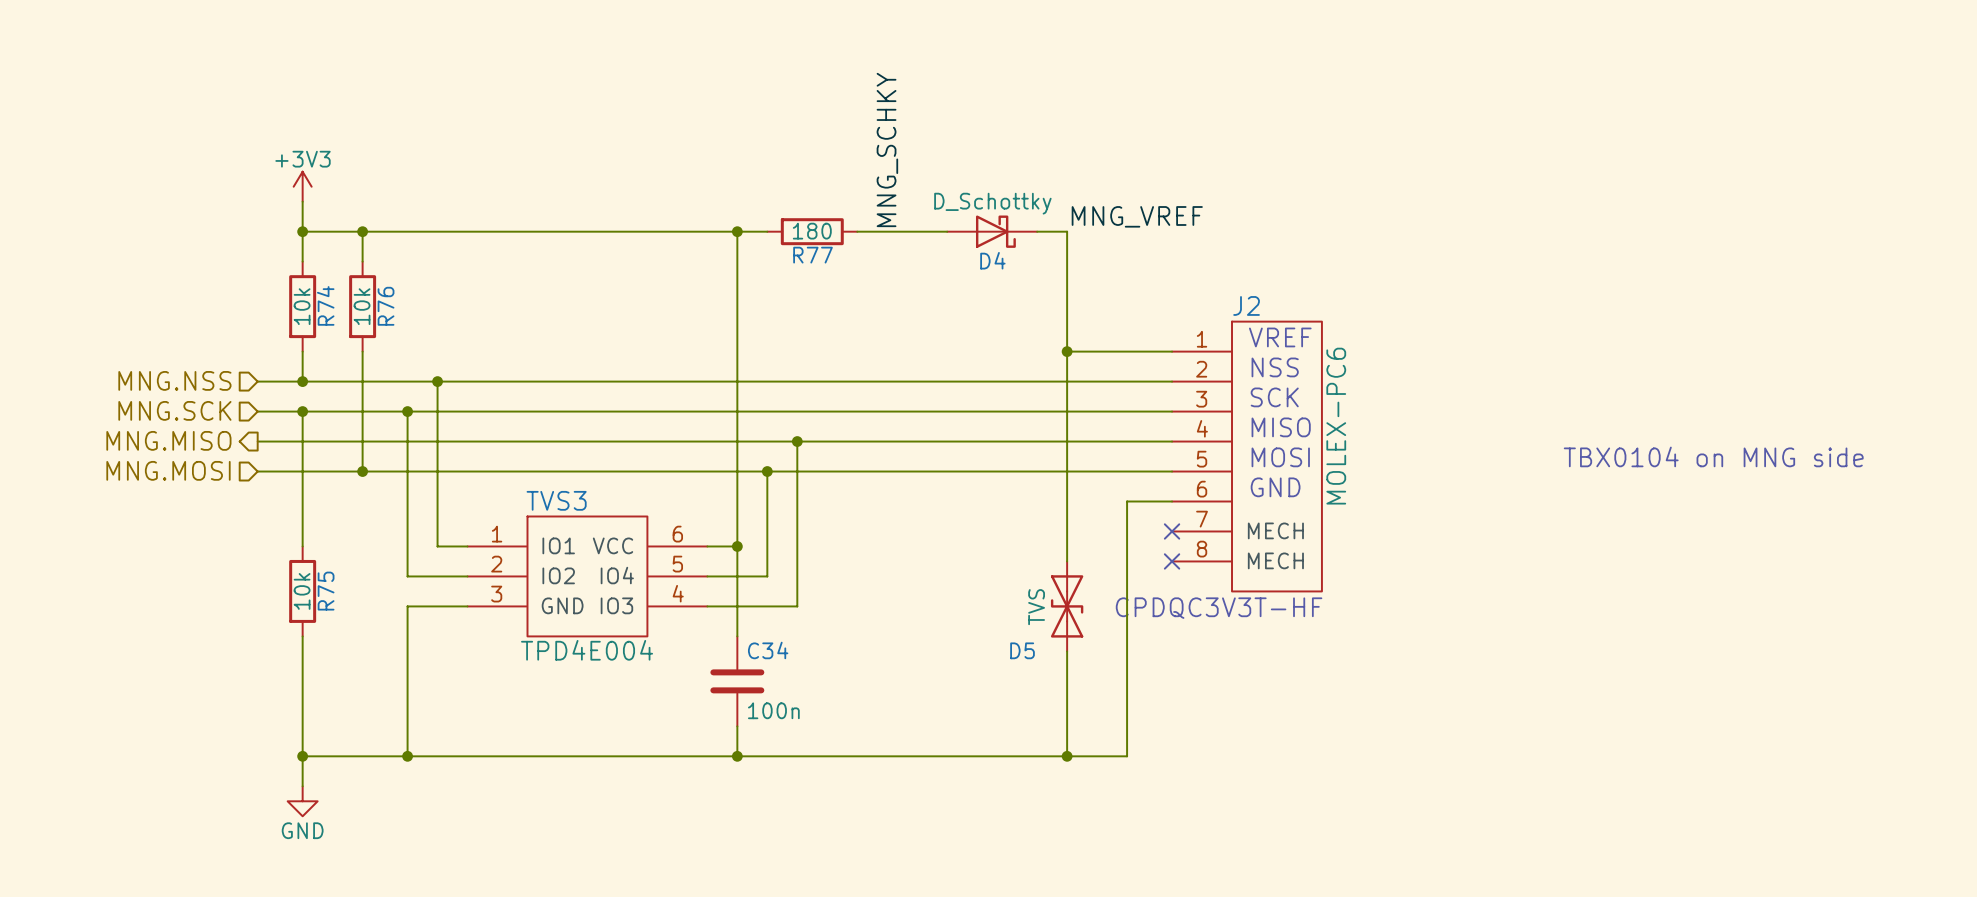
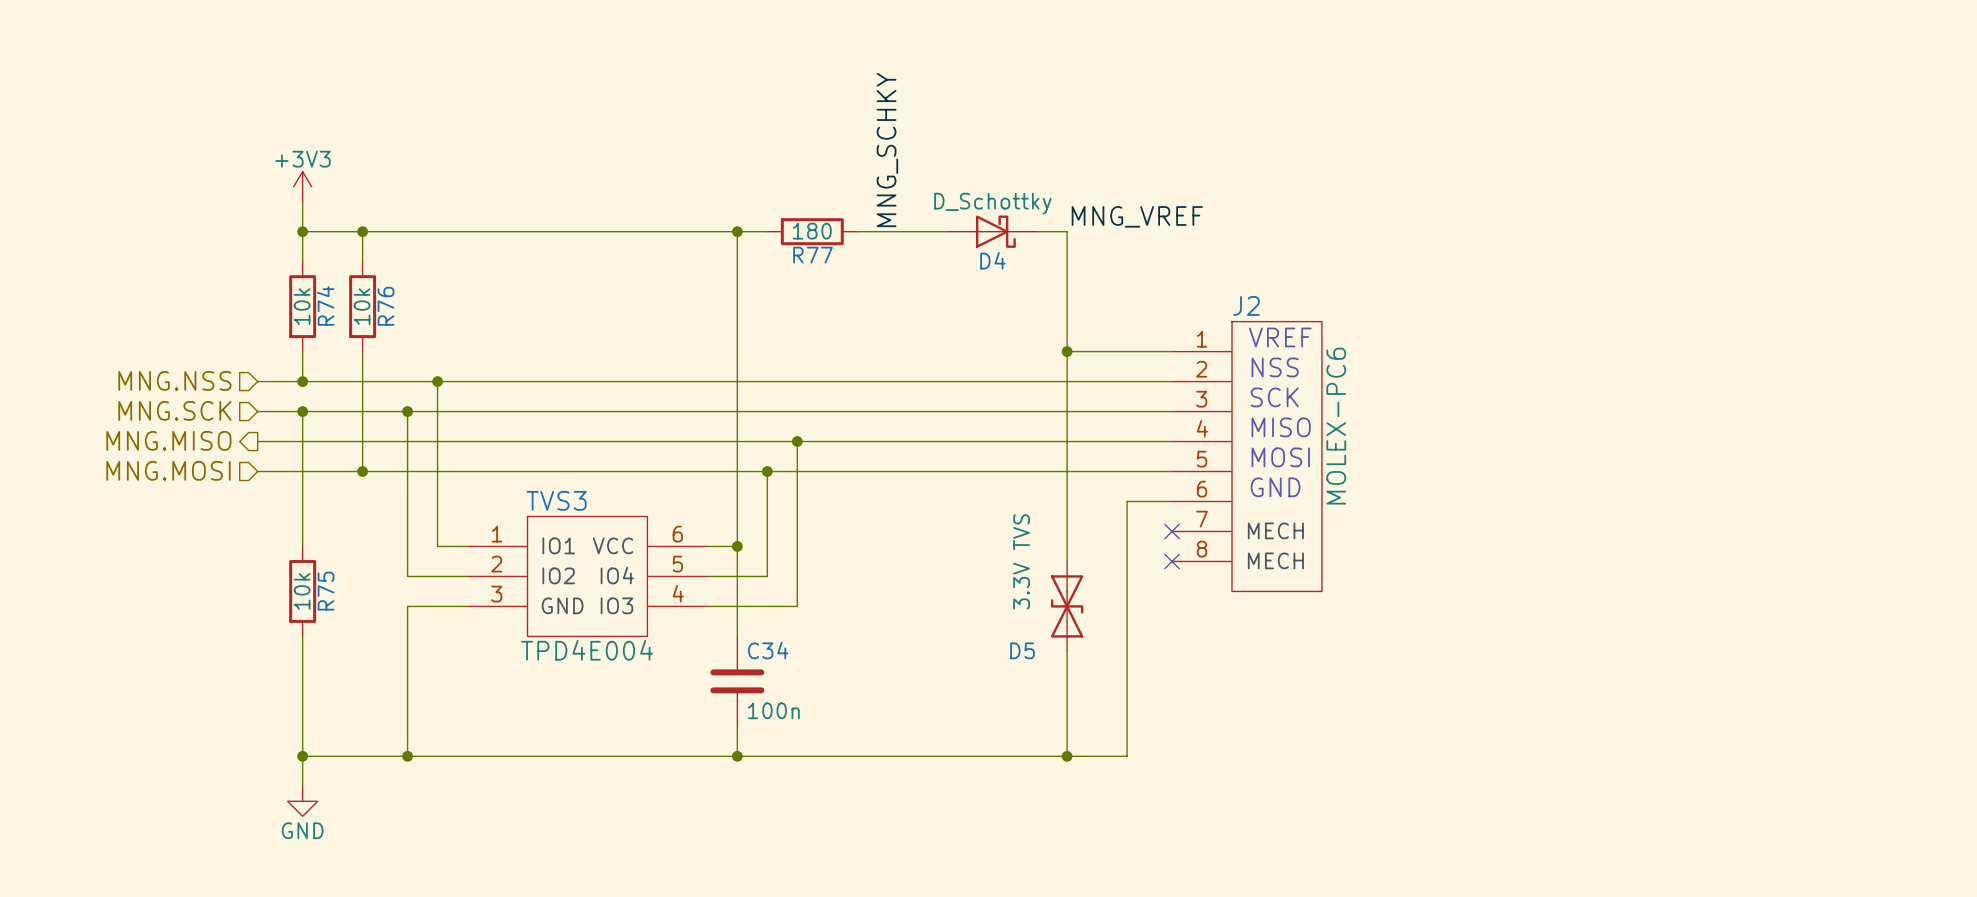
text: TBX0104 on MNG side (1713, 456) -> none
D5 value: TVS (1036, 607) -> 3.3V TVS (1021, 561)
text: CPDQC3V3T-HF (1219, 608) -> none

